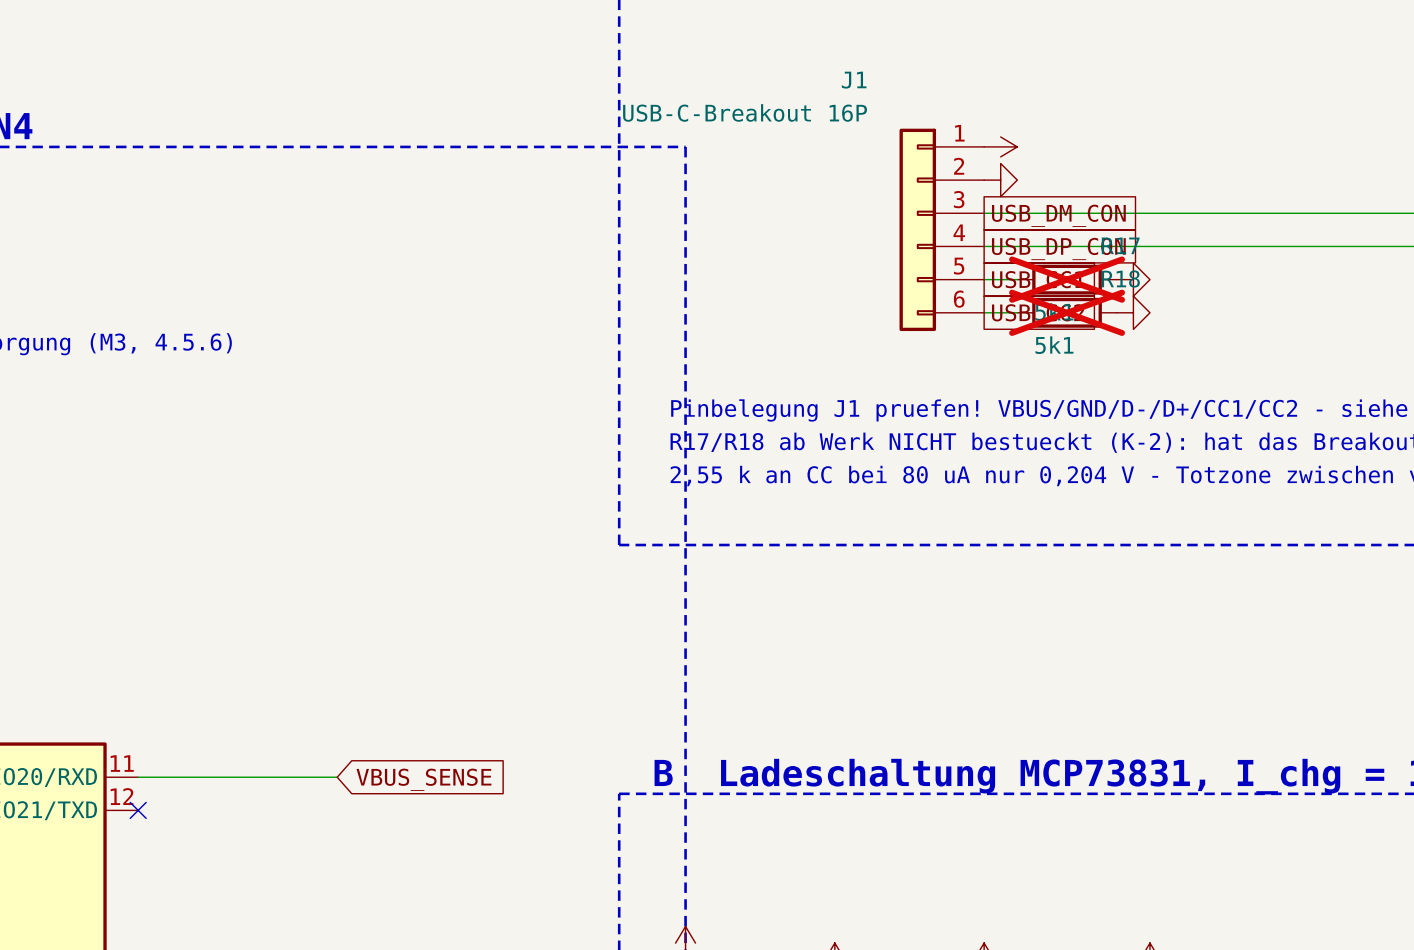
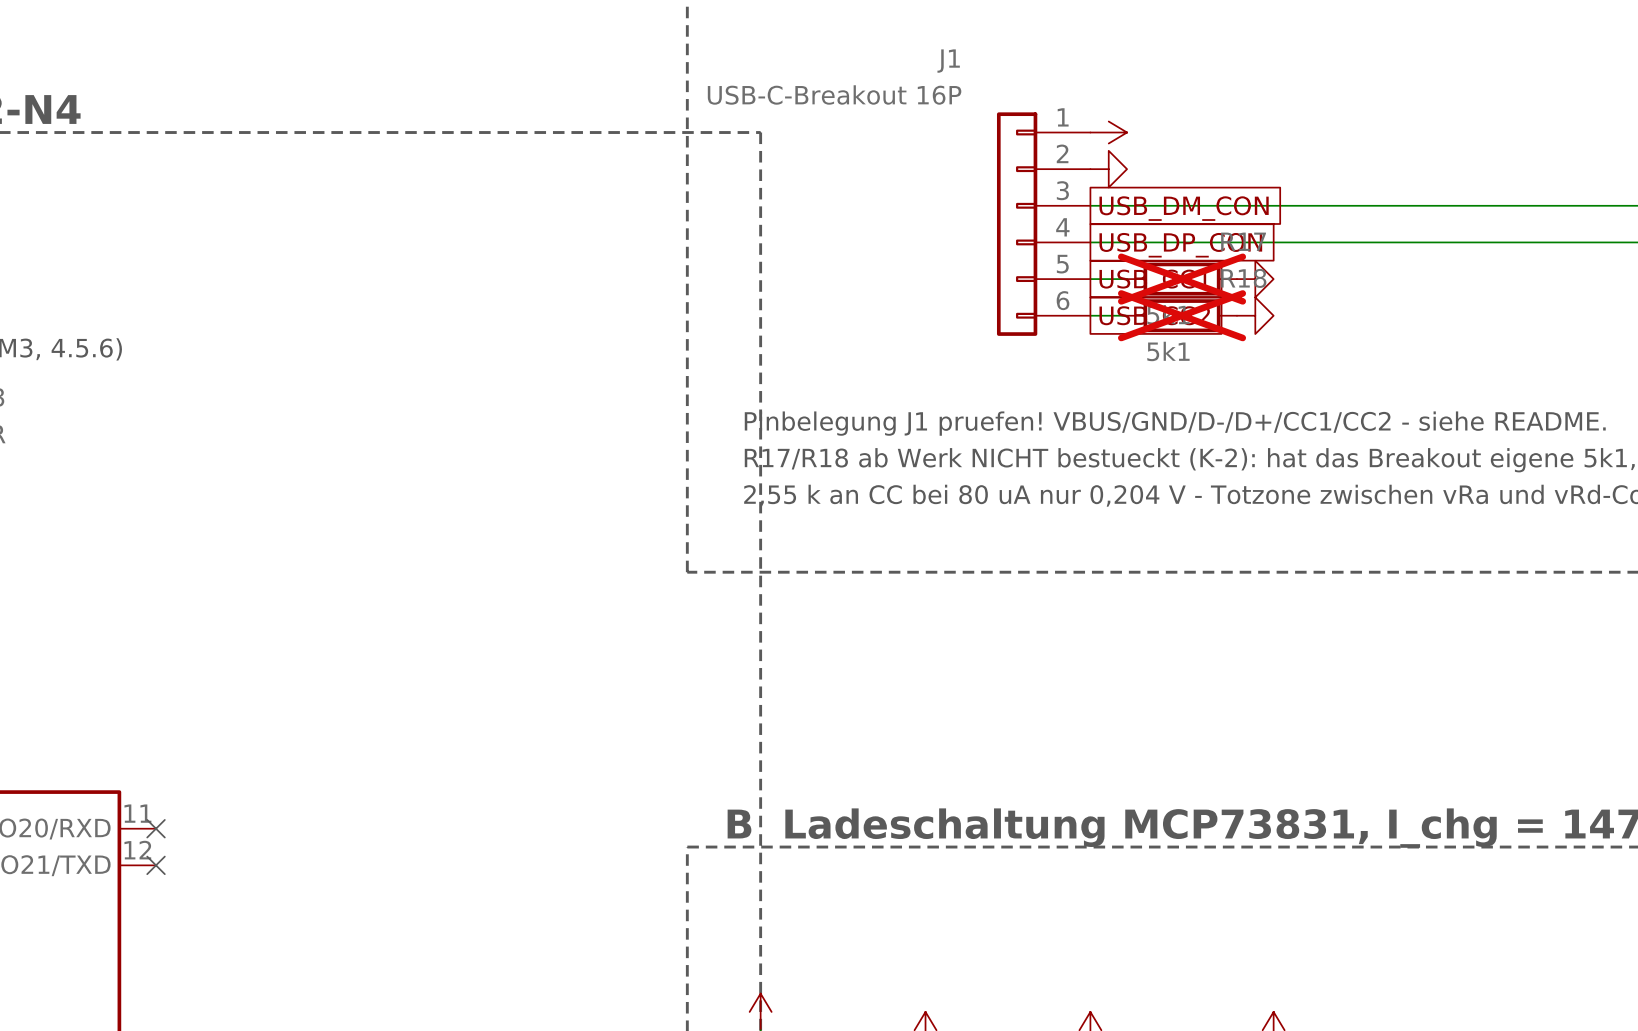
wire: (138, 777) (337, 777) -> none
no-connect mark: none -> (156, 828)
global label: VBUS_SENSE (423, 779) -> none

